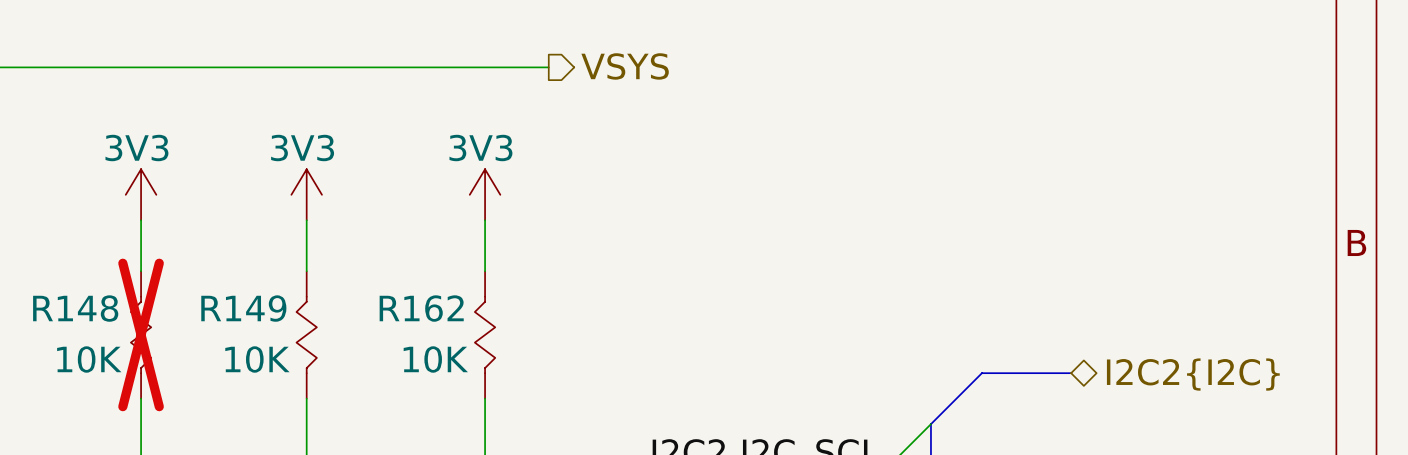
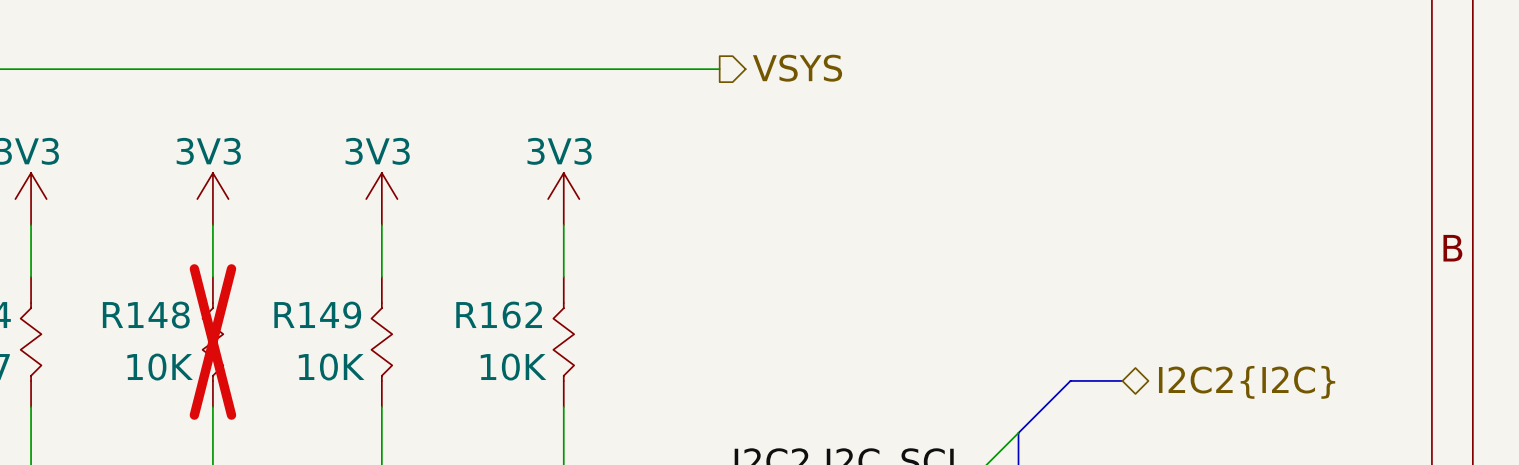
hierarchical label position: VSYS (625, 66) -> VSYS (797, 68)
wire: none -> (628, 69) (719, 69)
bus: (1032, 373) (1071, 373) -> none
hierarchical label position: I2C2{I2C} (1193, 374) -> I2C2{I2C} (1247, 382)

